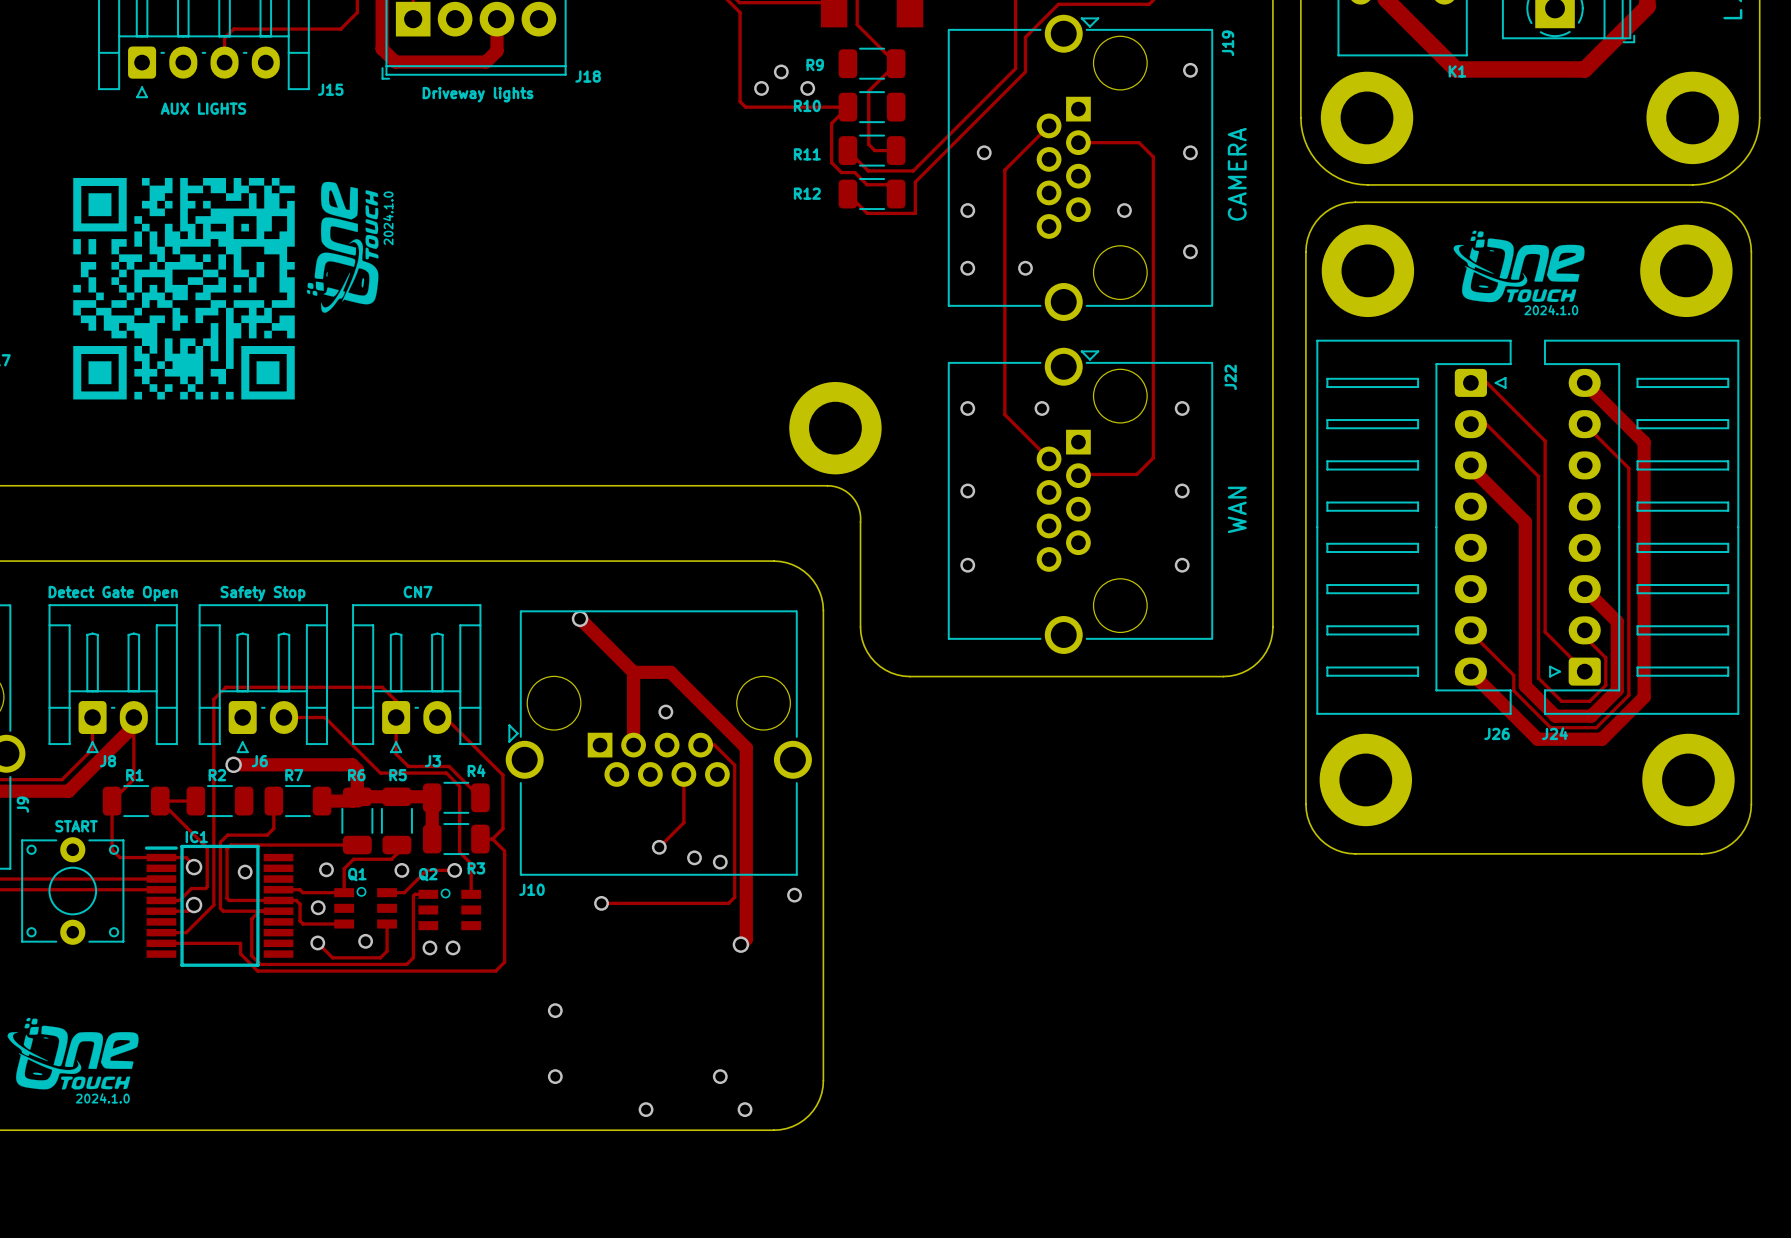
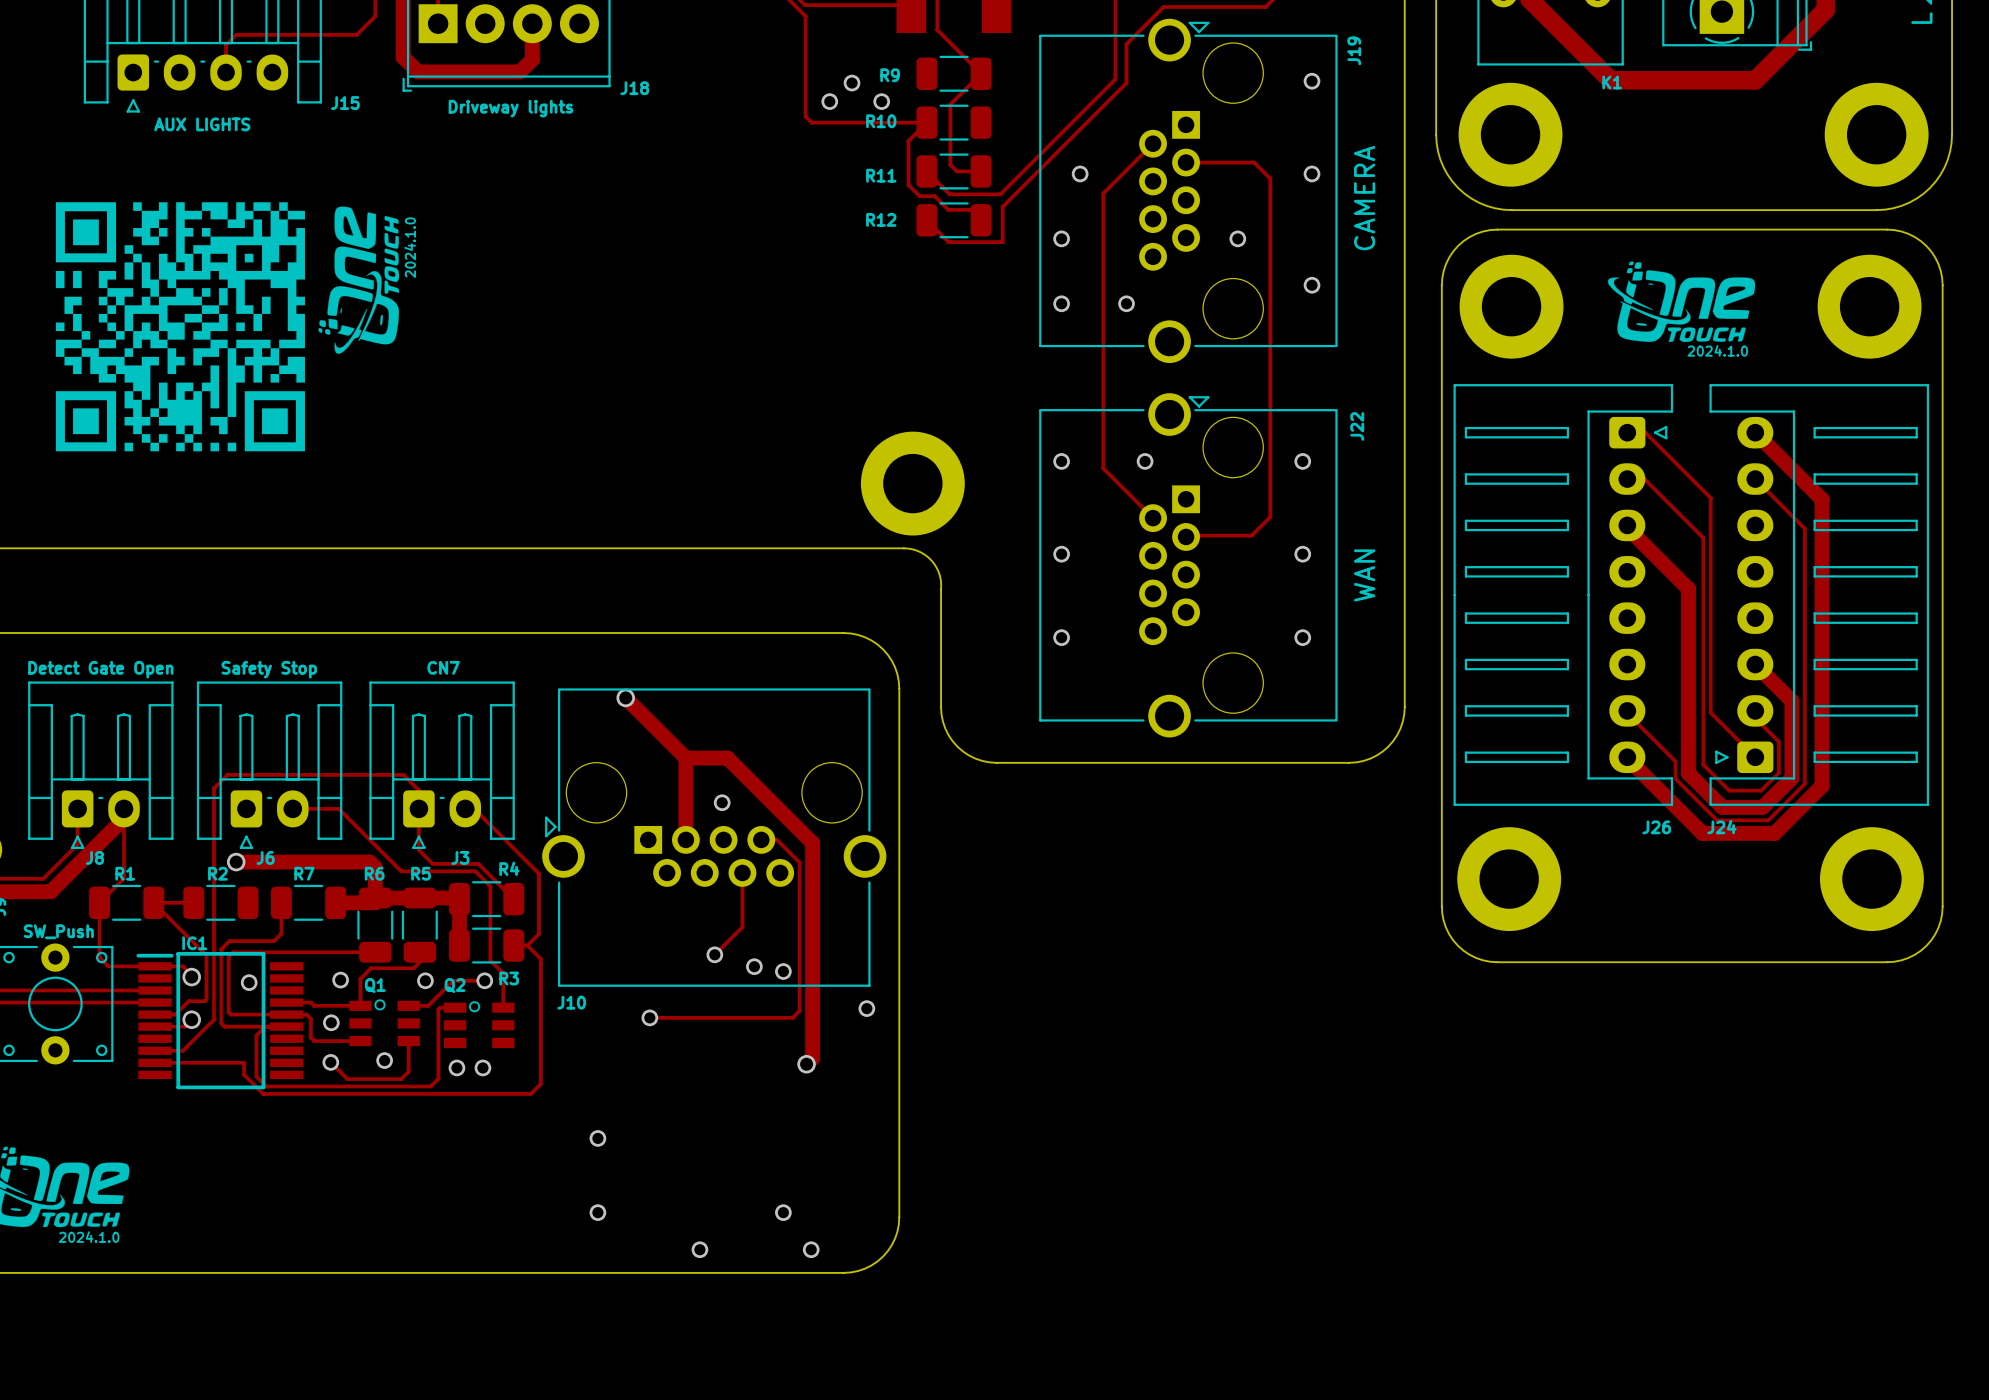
part value: START (76, 826) -> SW_Push (58, 931)

